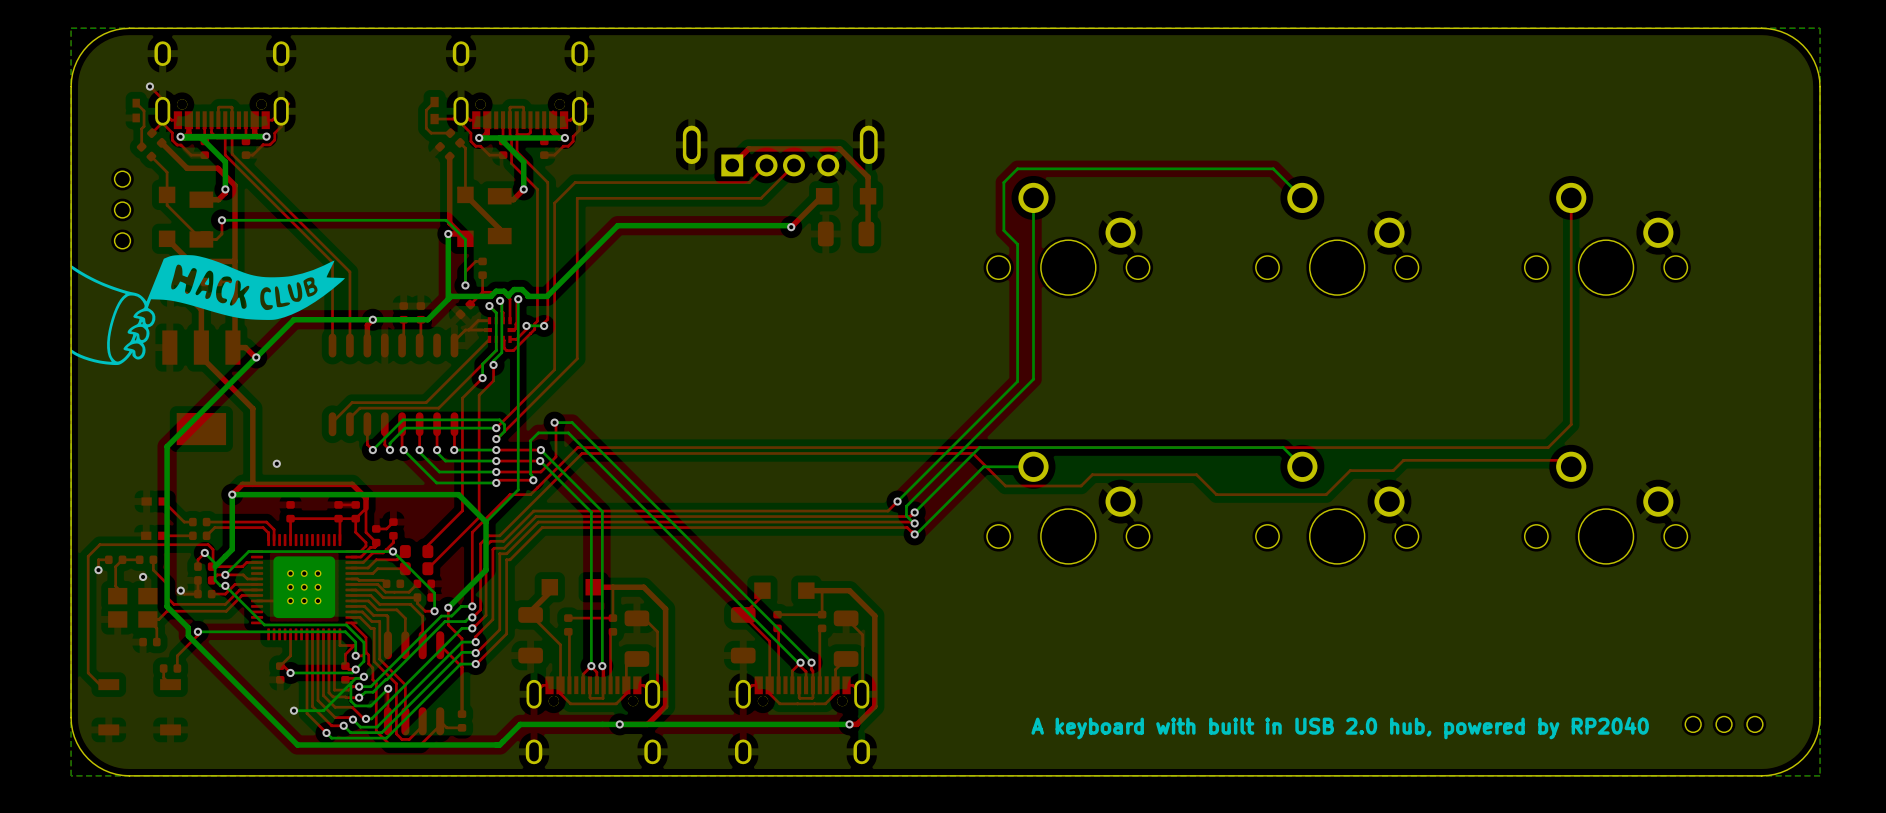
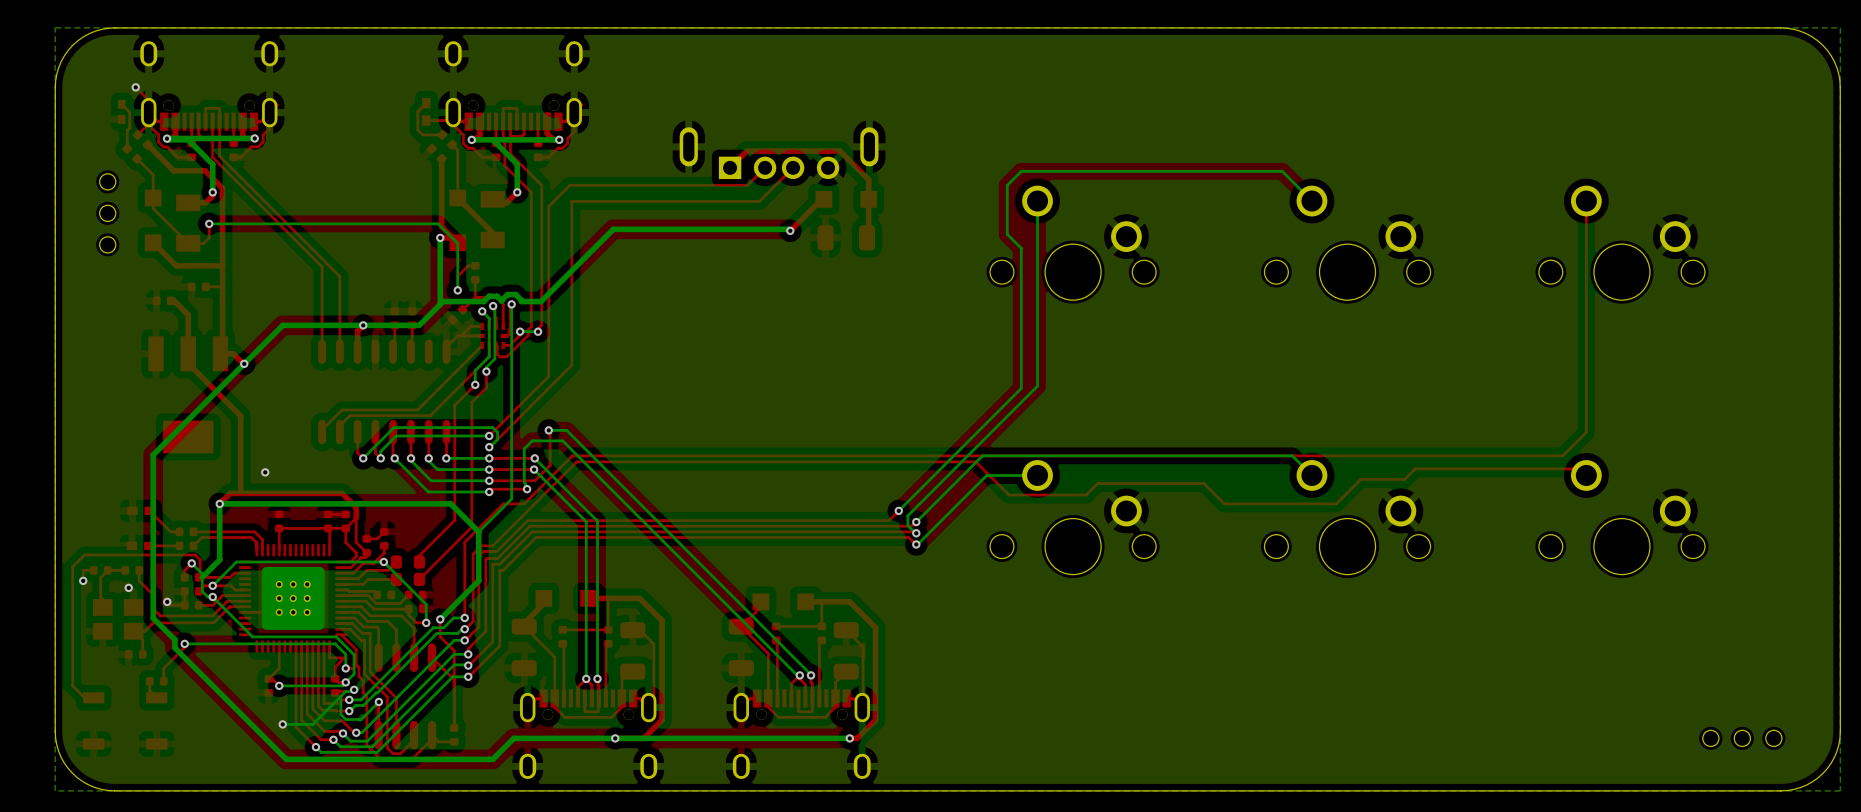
drawing: [71, 255, 345, 366] -> none
text: A keyboard with built in USB 2.0 hub, powered by RP2040 (1340, 728) -> none

